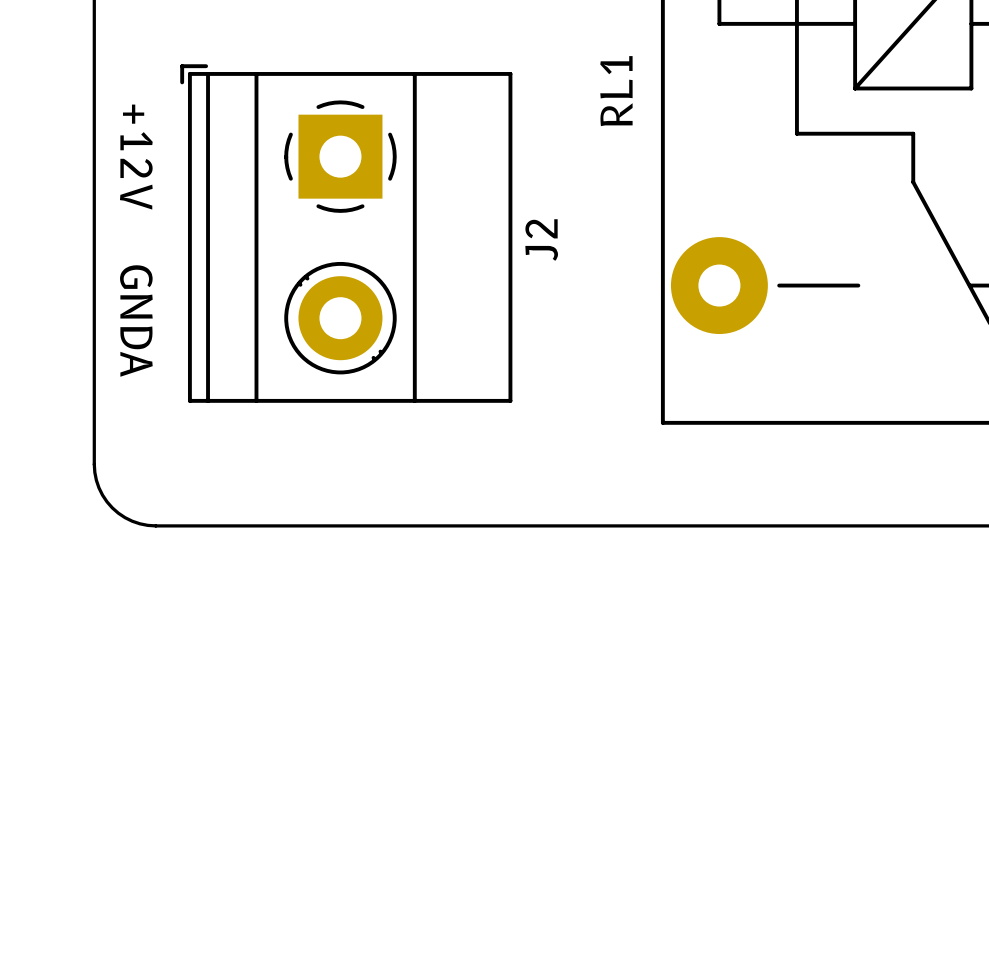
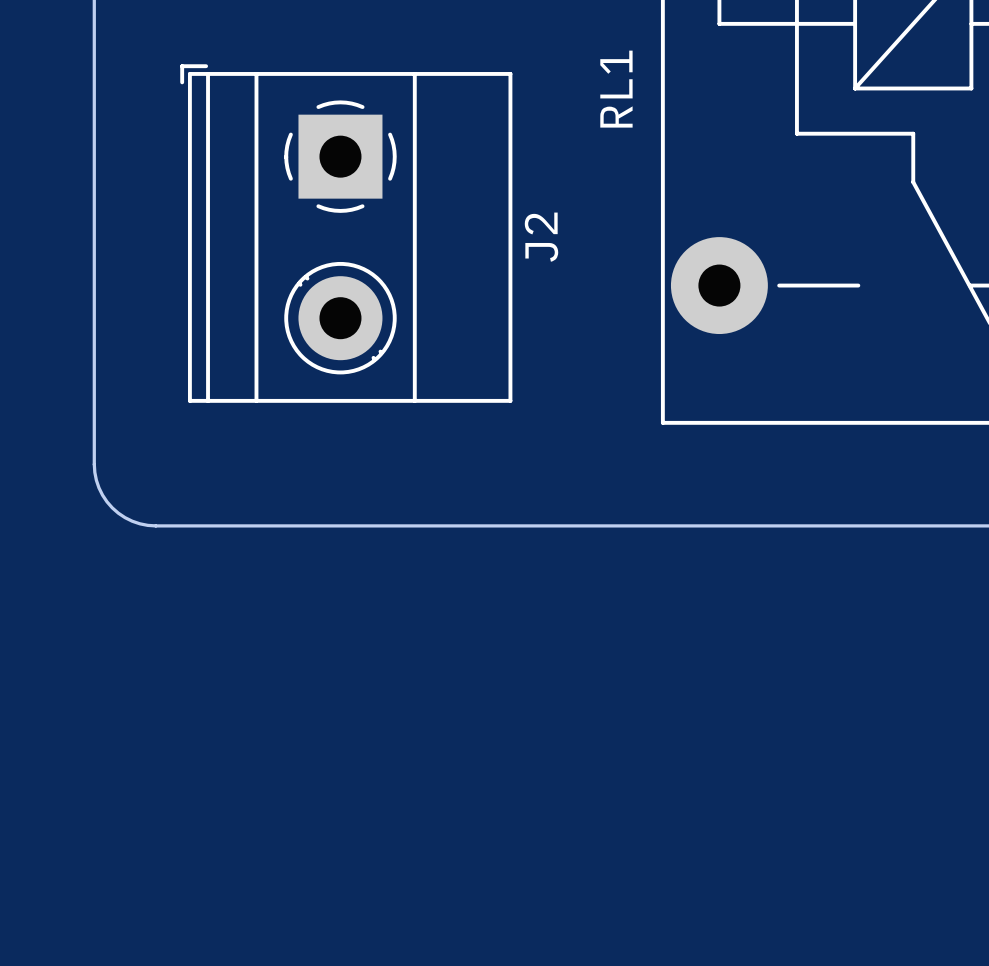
text: +12V (136, 157) -> none
text: GNDA (136, 321) -> none

